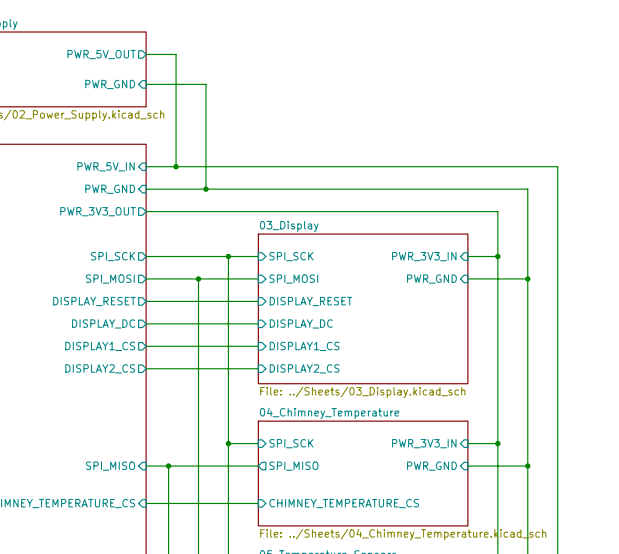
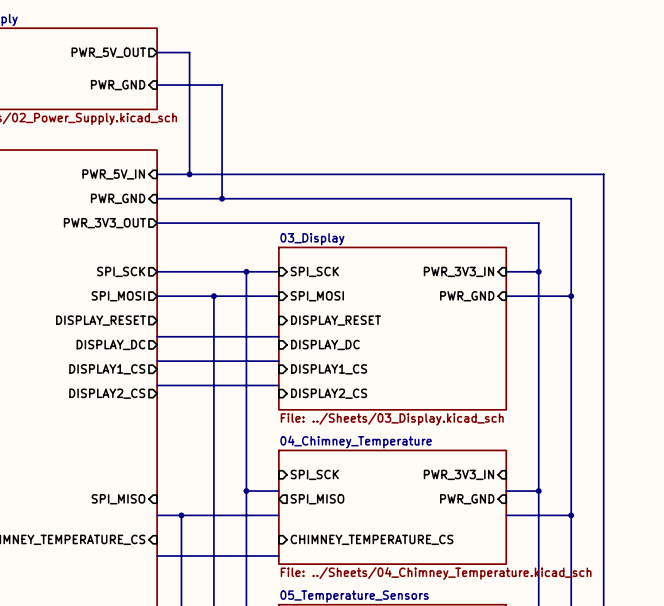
wire: (146, 301) (258, 301) -> (157, 336) (278, 336)
wire: (146, 323) (258, 323) -> (157, 361) (278, 361)
wire: (146, 346) (258, 346) -> (157, 385) (278, 385)
wire: (146, 368) (258, 368) -> none
wire: (228, 443) (258, 443) -> (246, 491) (278, 491)
junction position: (228, 443) -> (246, 491)
wire: (467, 443) (497, 443) -> (506, 491) (538, 491)
junction position: (497, 443) -> (538, 491)
wire: (146, 466) (258, 466) -> (157, 515) (278, 515)
wire: (168, 466) (168, 481) -> none
junction position: (168, 466) -> (181, 515)
wire: (467, 466) (527, 466) -> (506, 515) (571, 515)
junction position: (527, 466) -> (571, 515)
wire: (146, 503) (258, 503) -> (157, 556) (278, 556)

